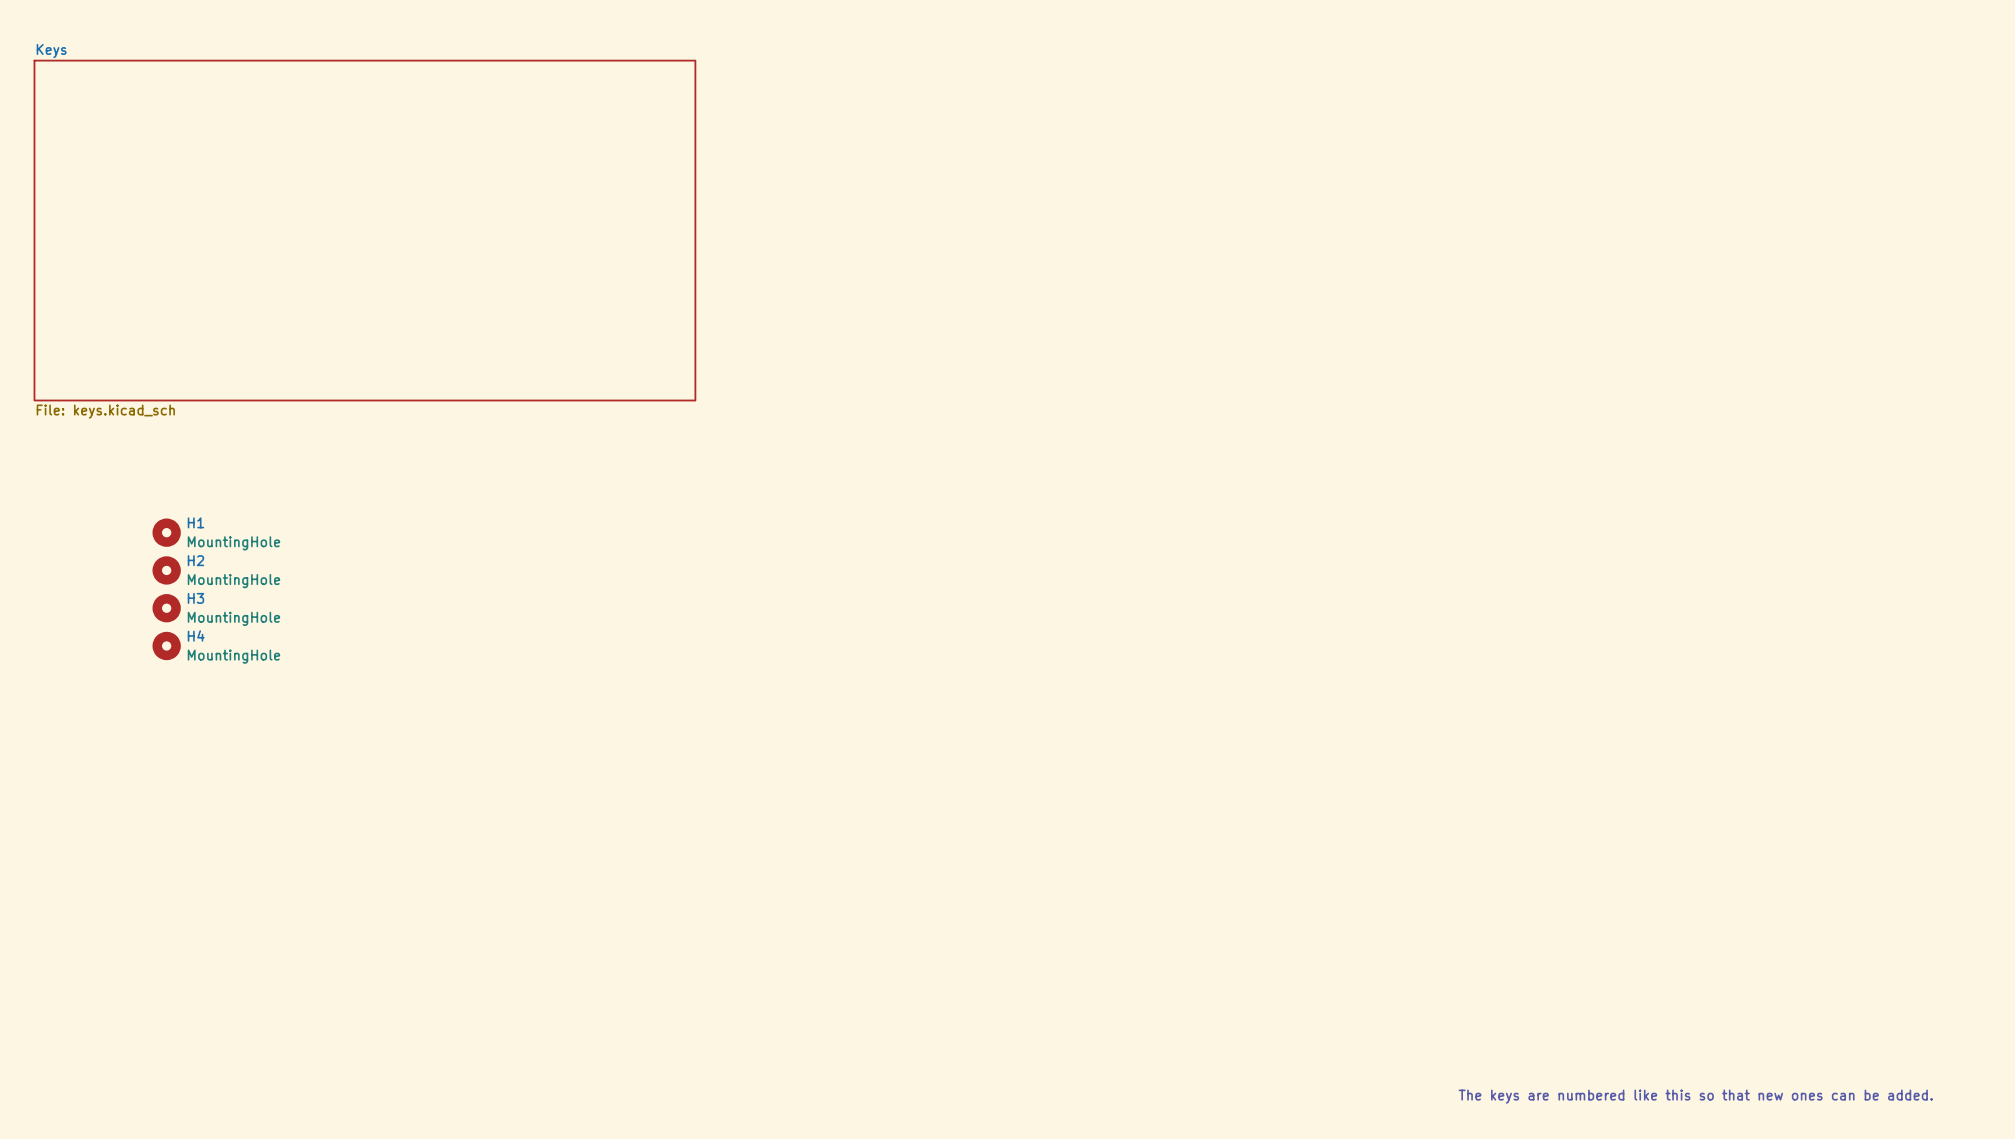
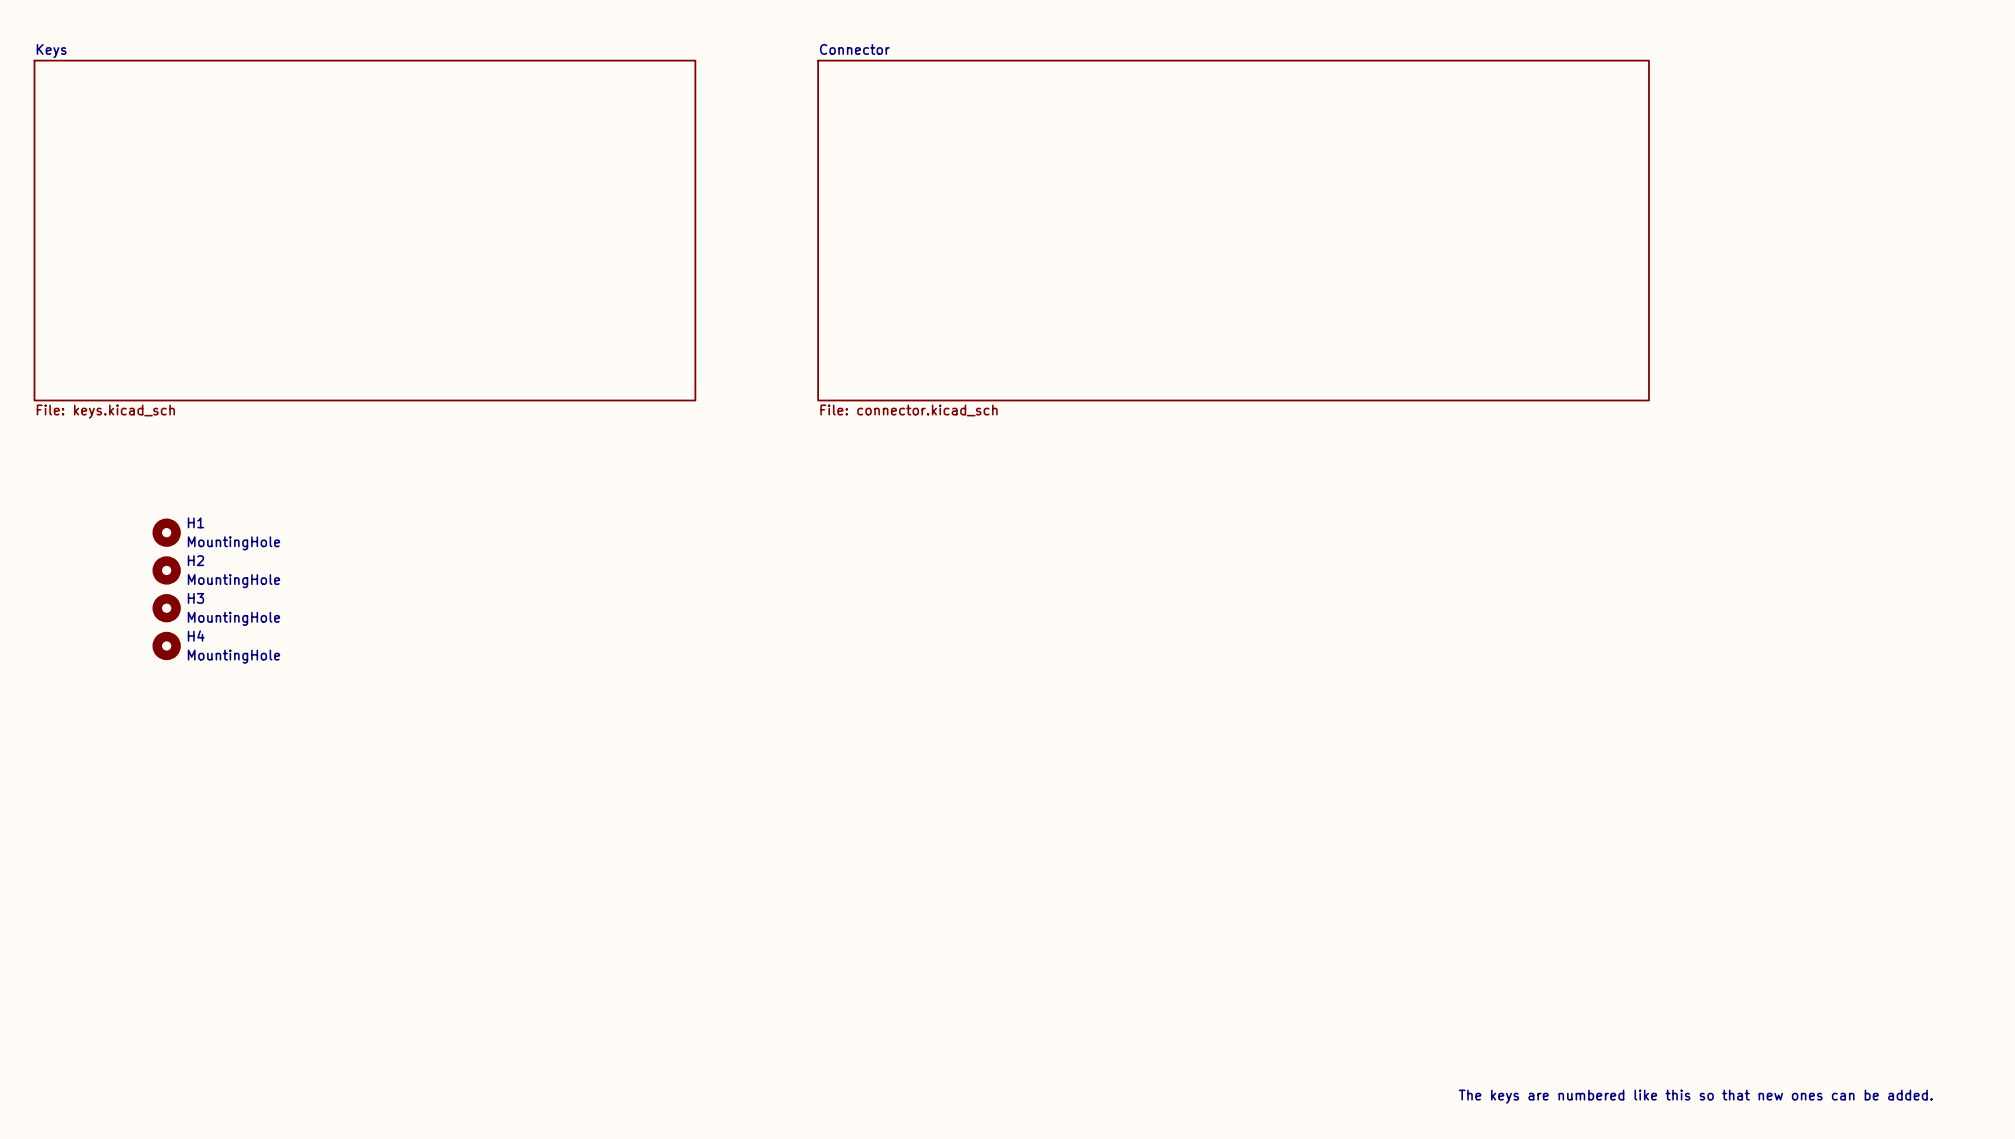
sheet Connector: none -> File: connector.kicad_sch (1233, 230)

